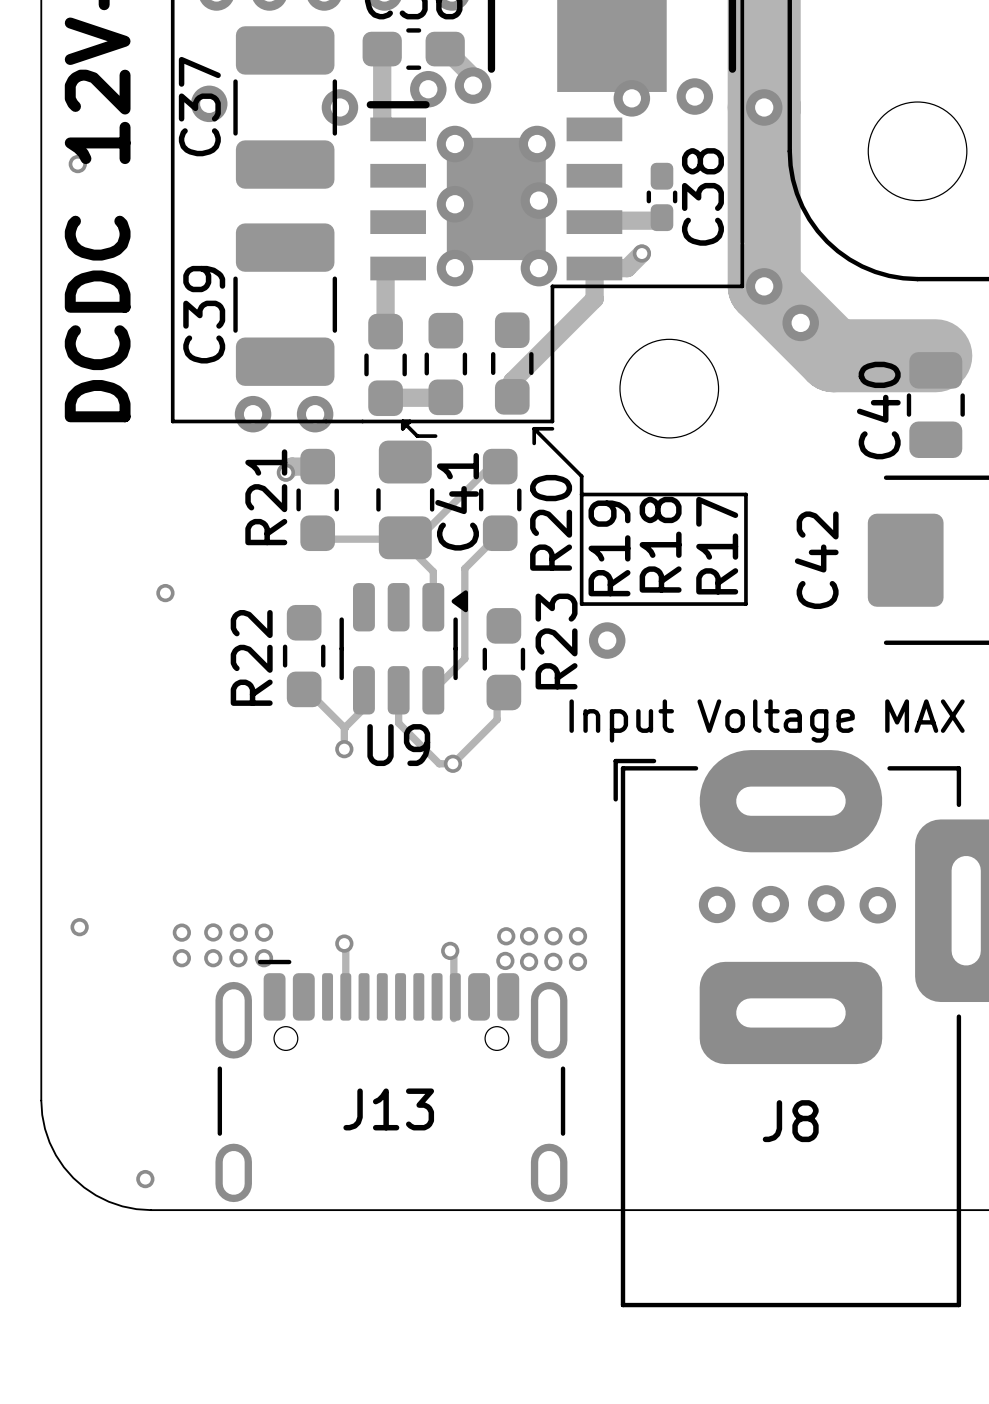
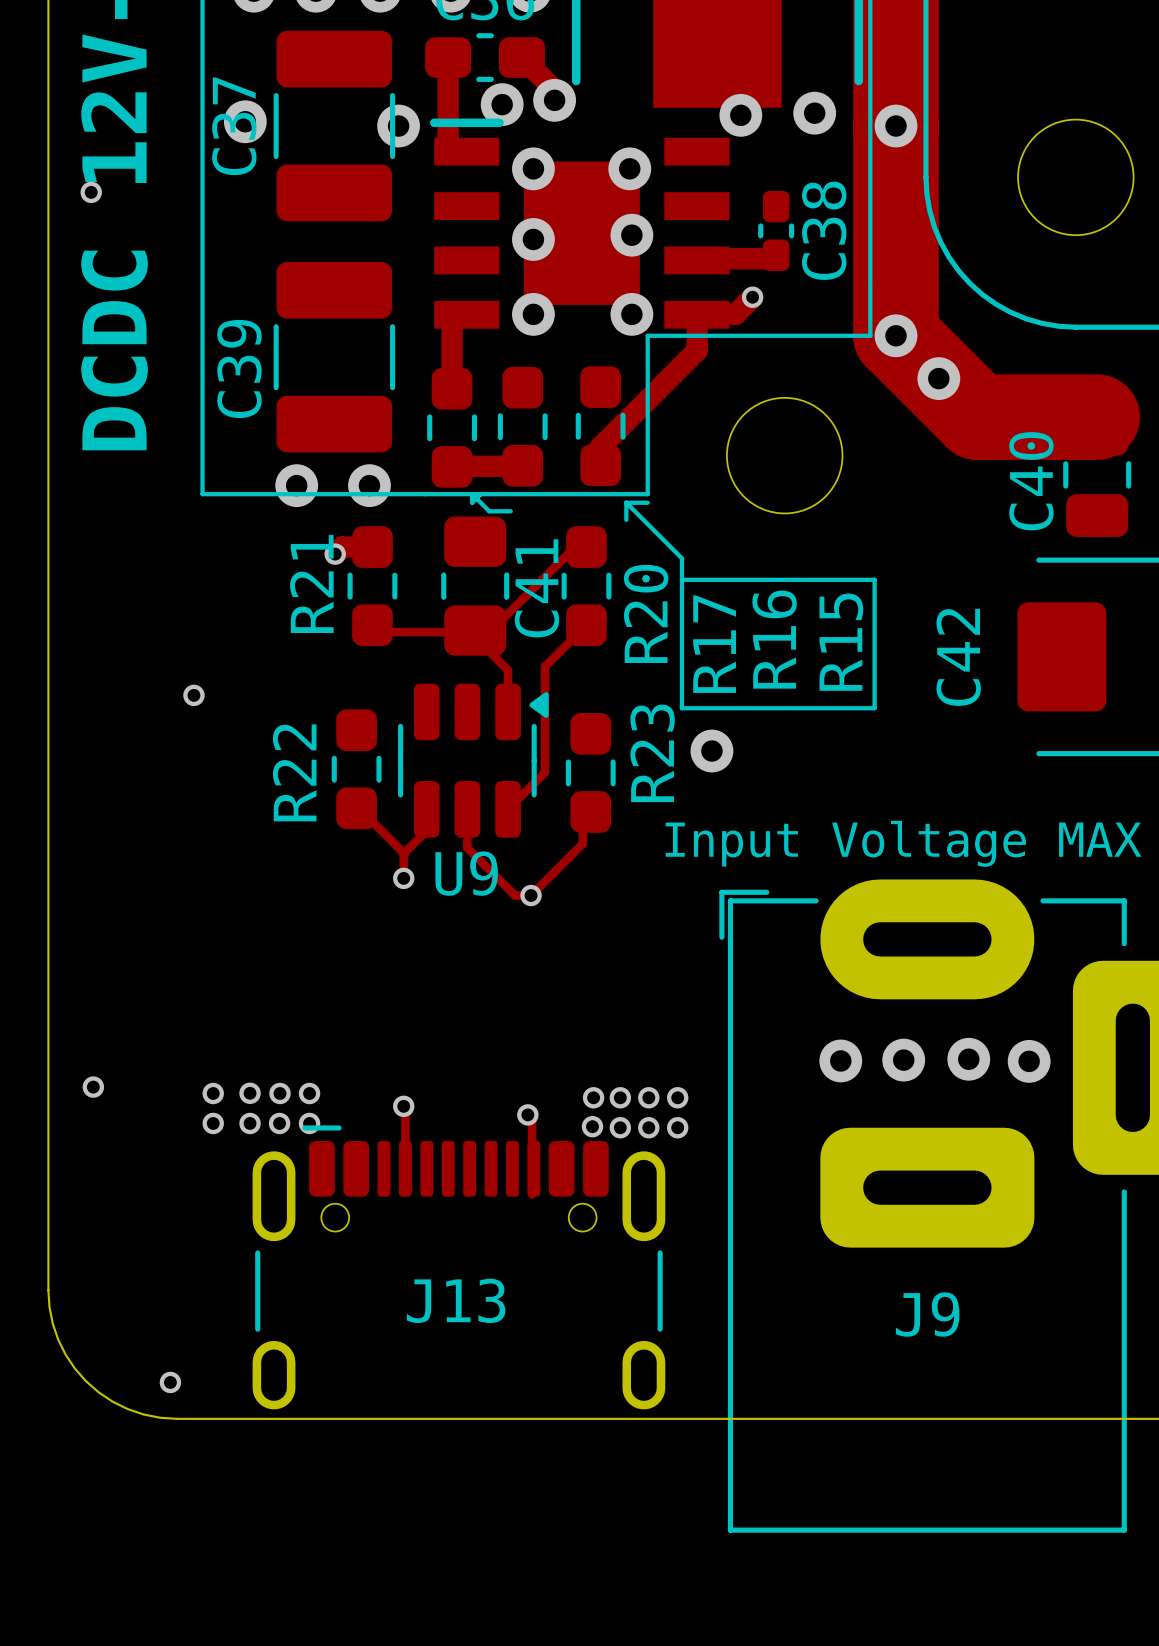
R18 name: R18 (660, 544) -> R16 (774, 639)
R17 name: R17 (717, 545) -> R15 (841, 642)
R19 name: R19 (609, 548) -> R17 (714, 644)
J8 name: J8 (790, 1121) -> J9 (927, 1314)

